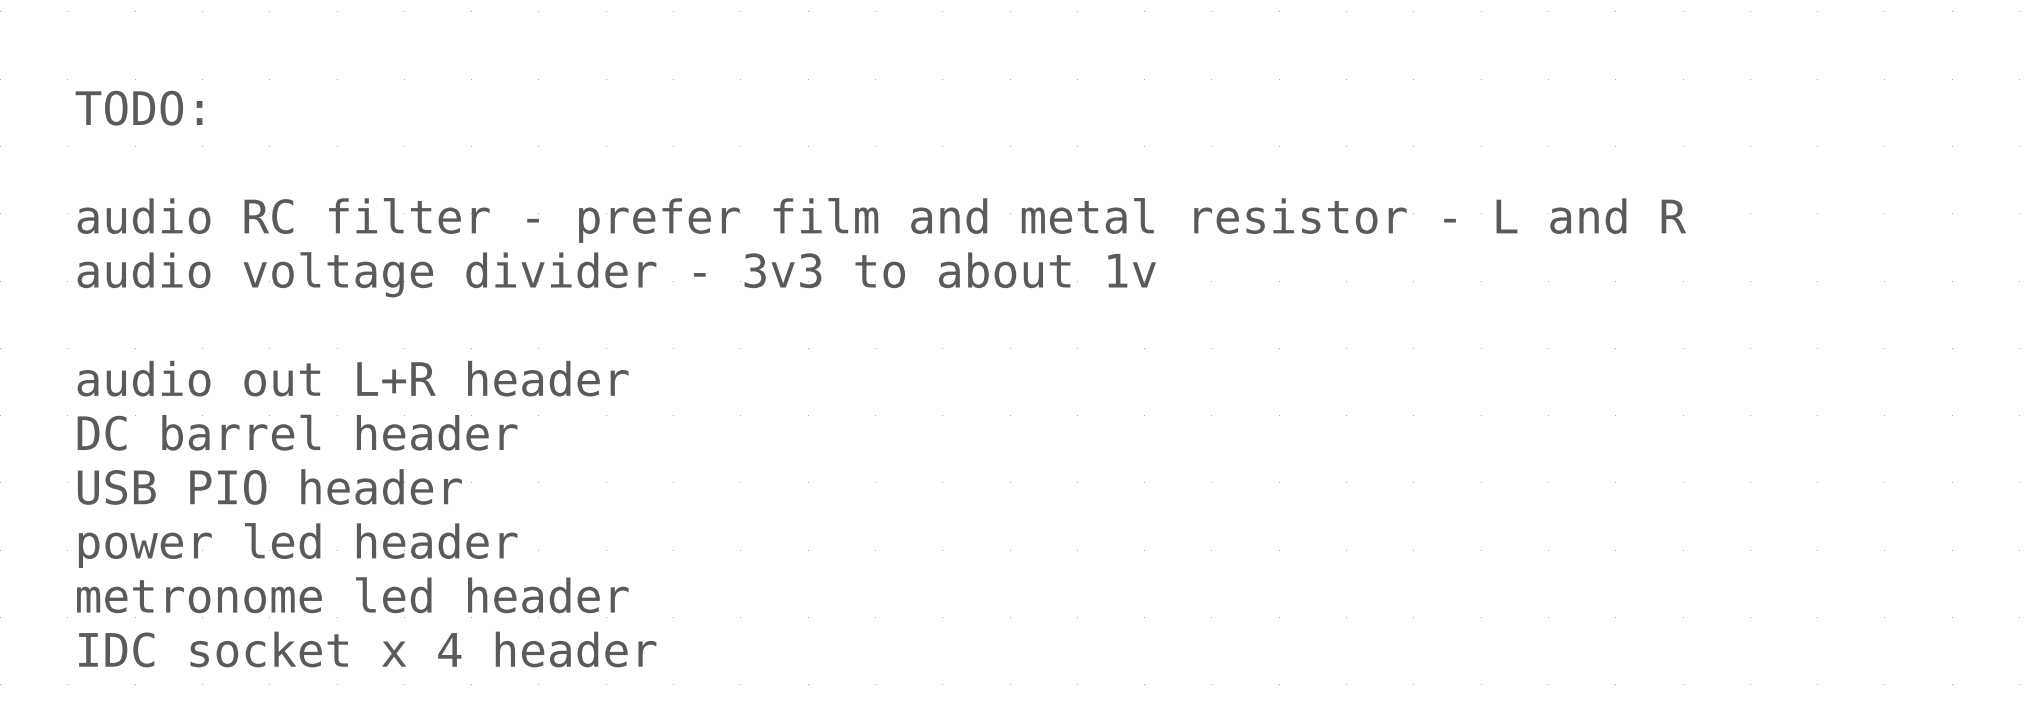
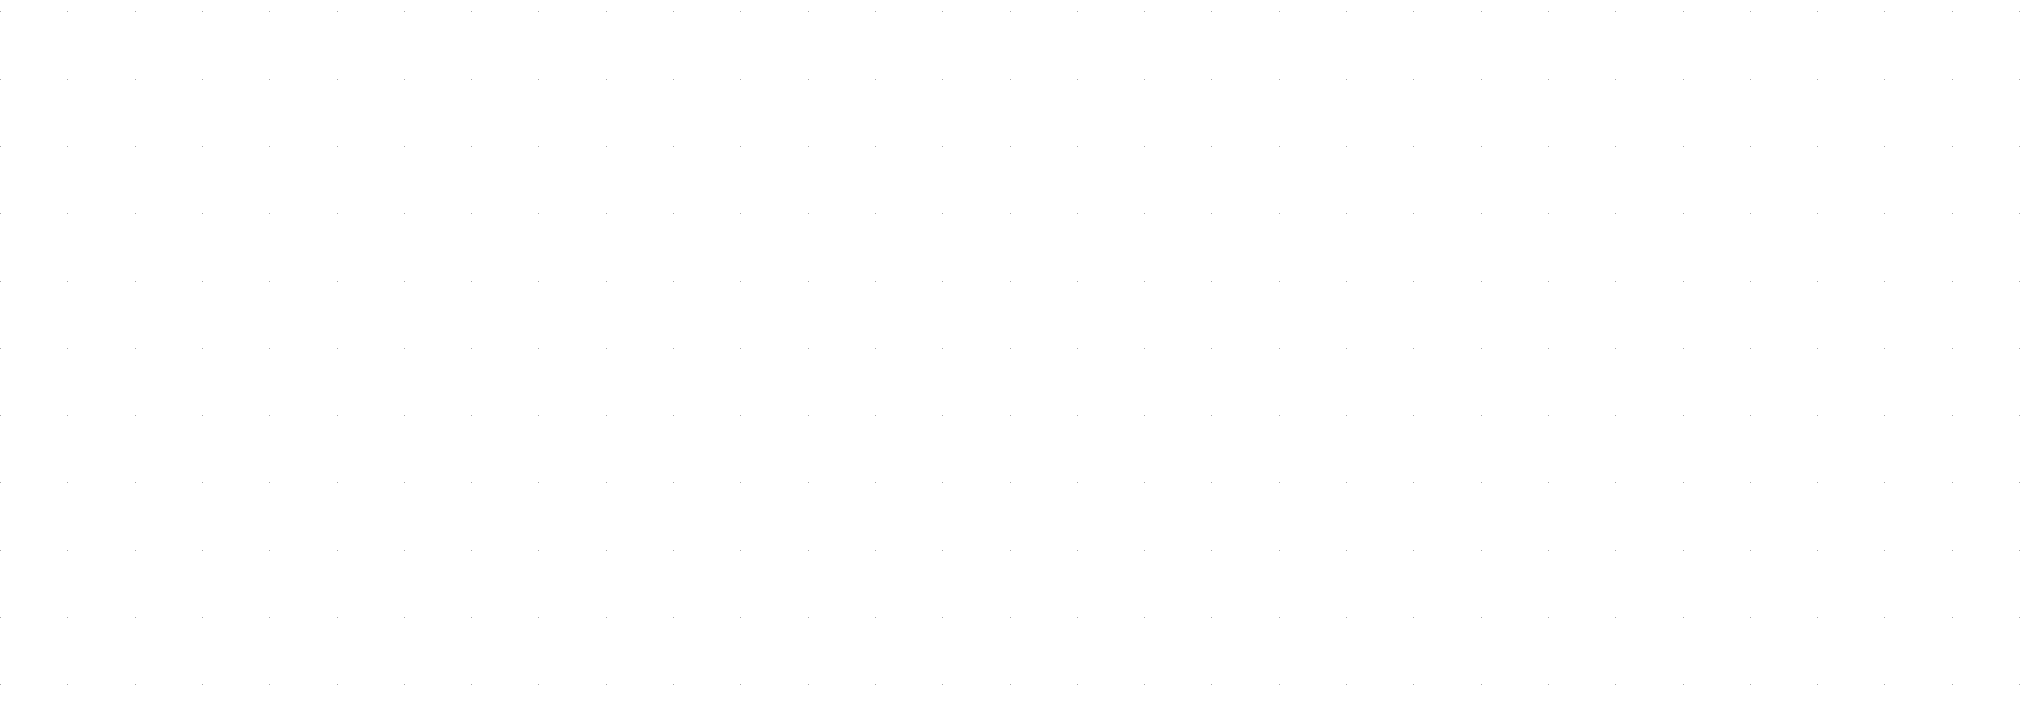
text: TODO: (139, 108) -> none
text: audio RC filter - prefer film and metal resistor - L and R (881, 220) -> none
text: audio voltage divider - 3v3 to about 1v (616, 274) -> none
text: audio out L+R header (353, 378) -> none
text: DC barrel header (297, 432) -> none
text: USB PIO header (269, 487) -> none
text: power led header (298, 545) -> none
text: metronome led header (352, 595) -> none
text: IDC socket x 4 header (367, 649) -> none

